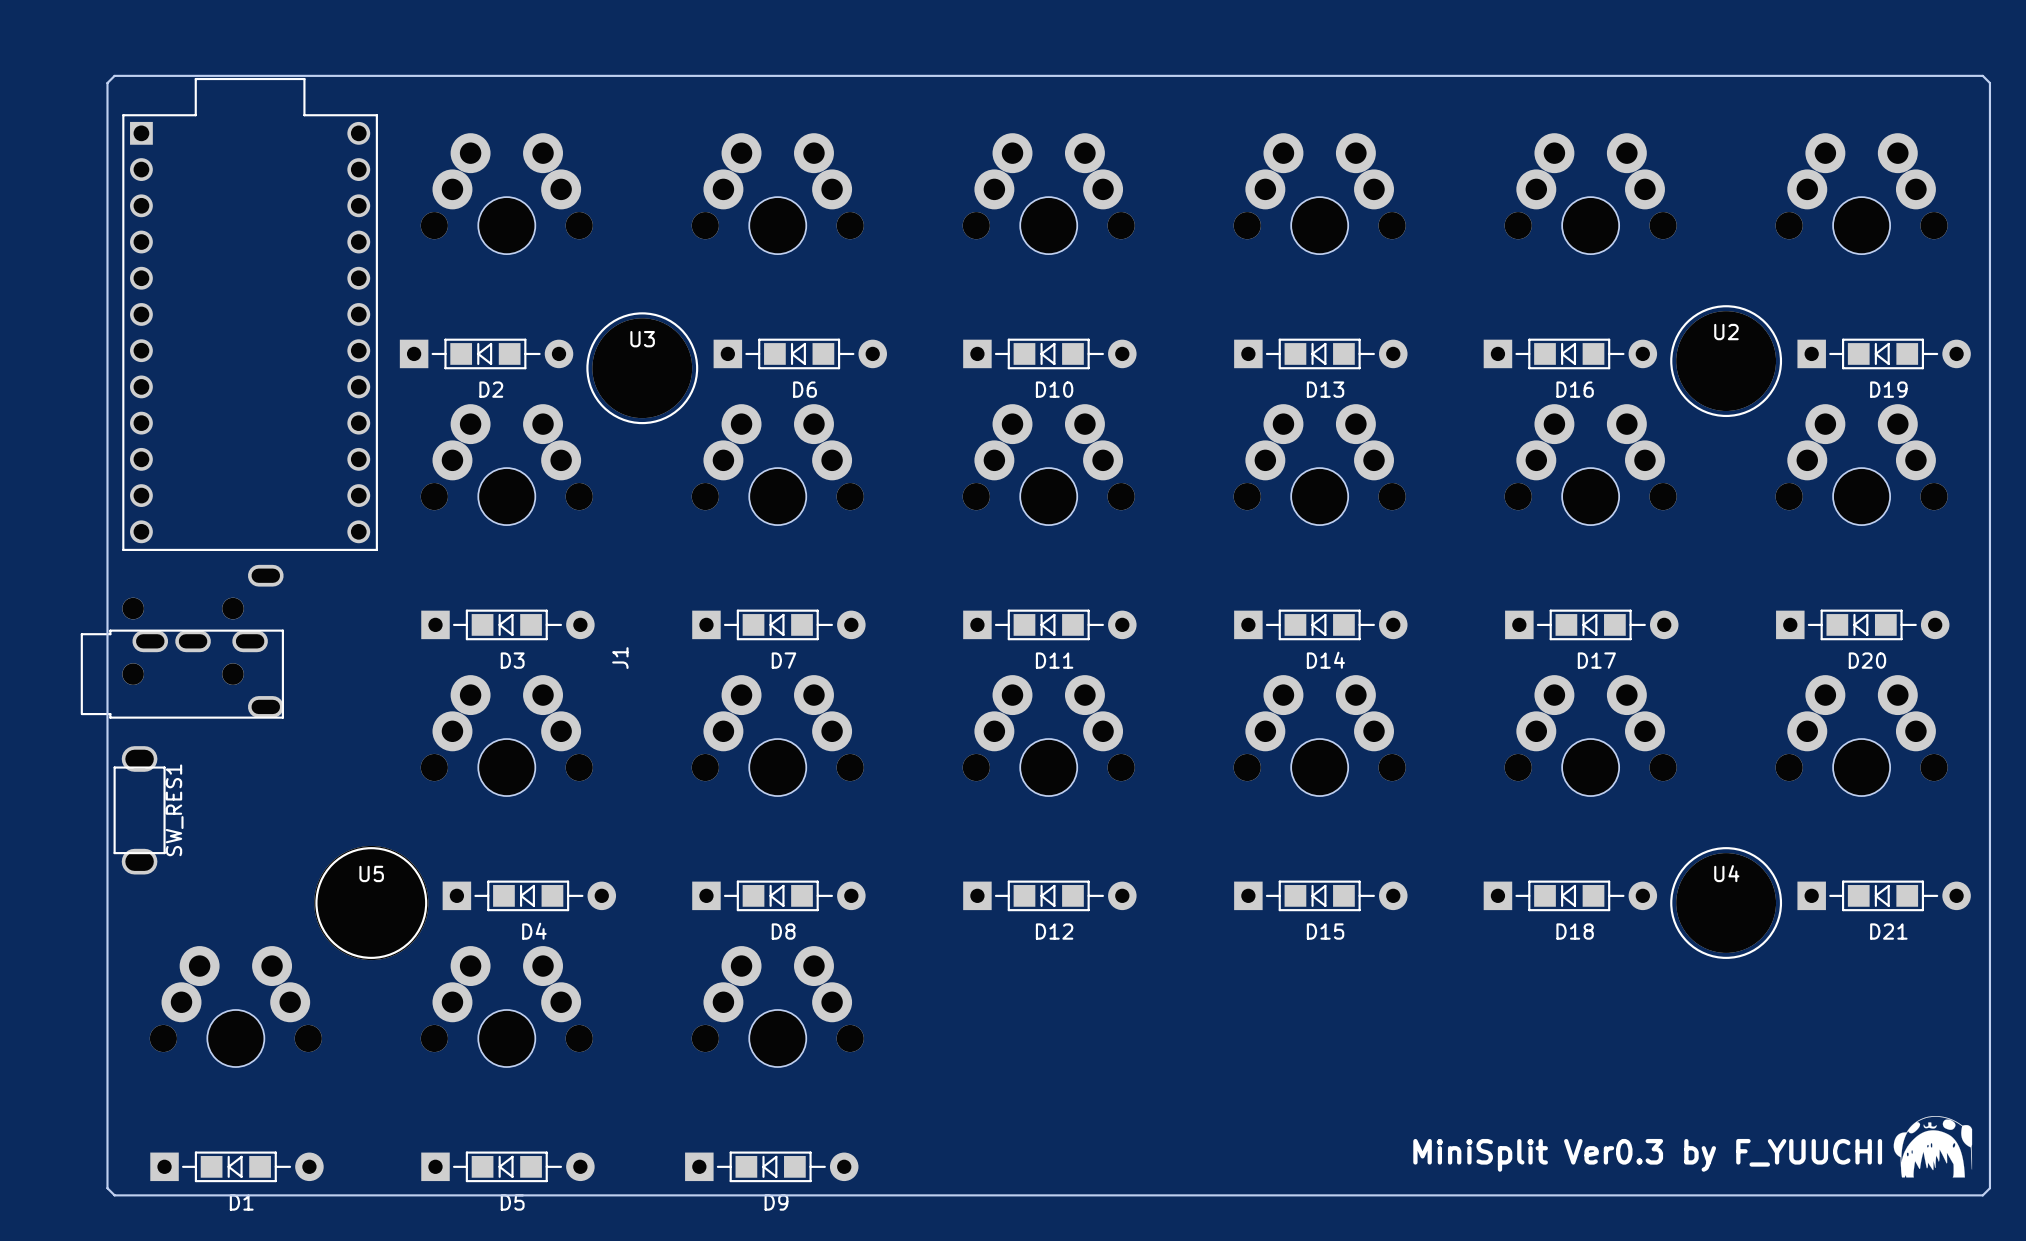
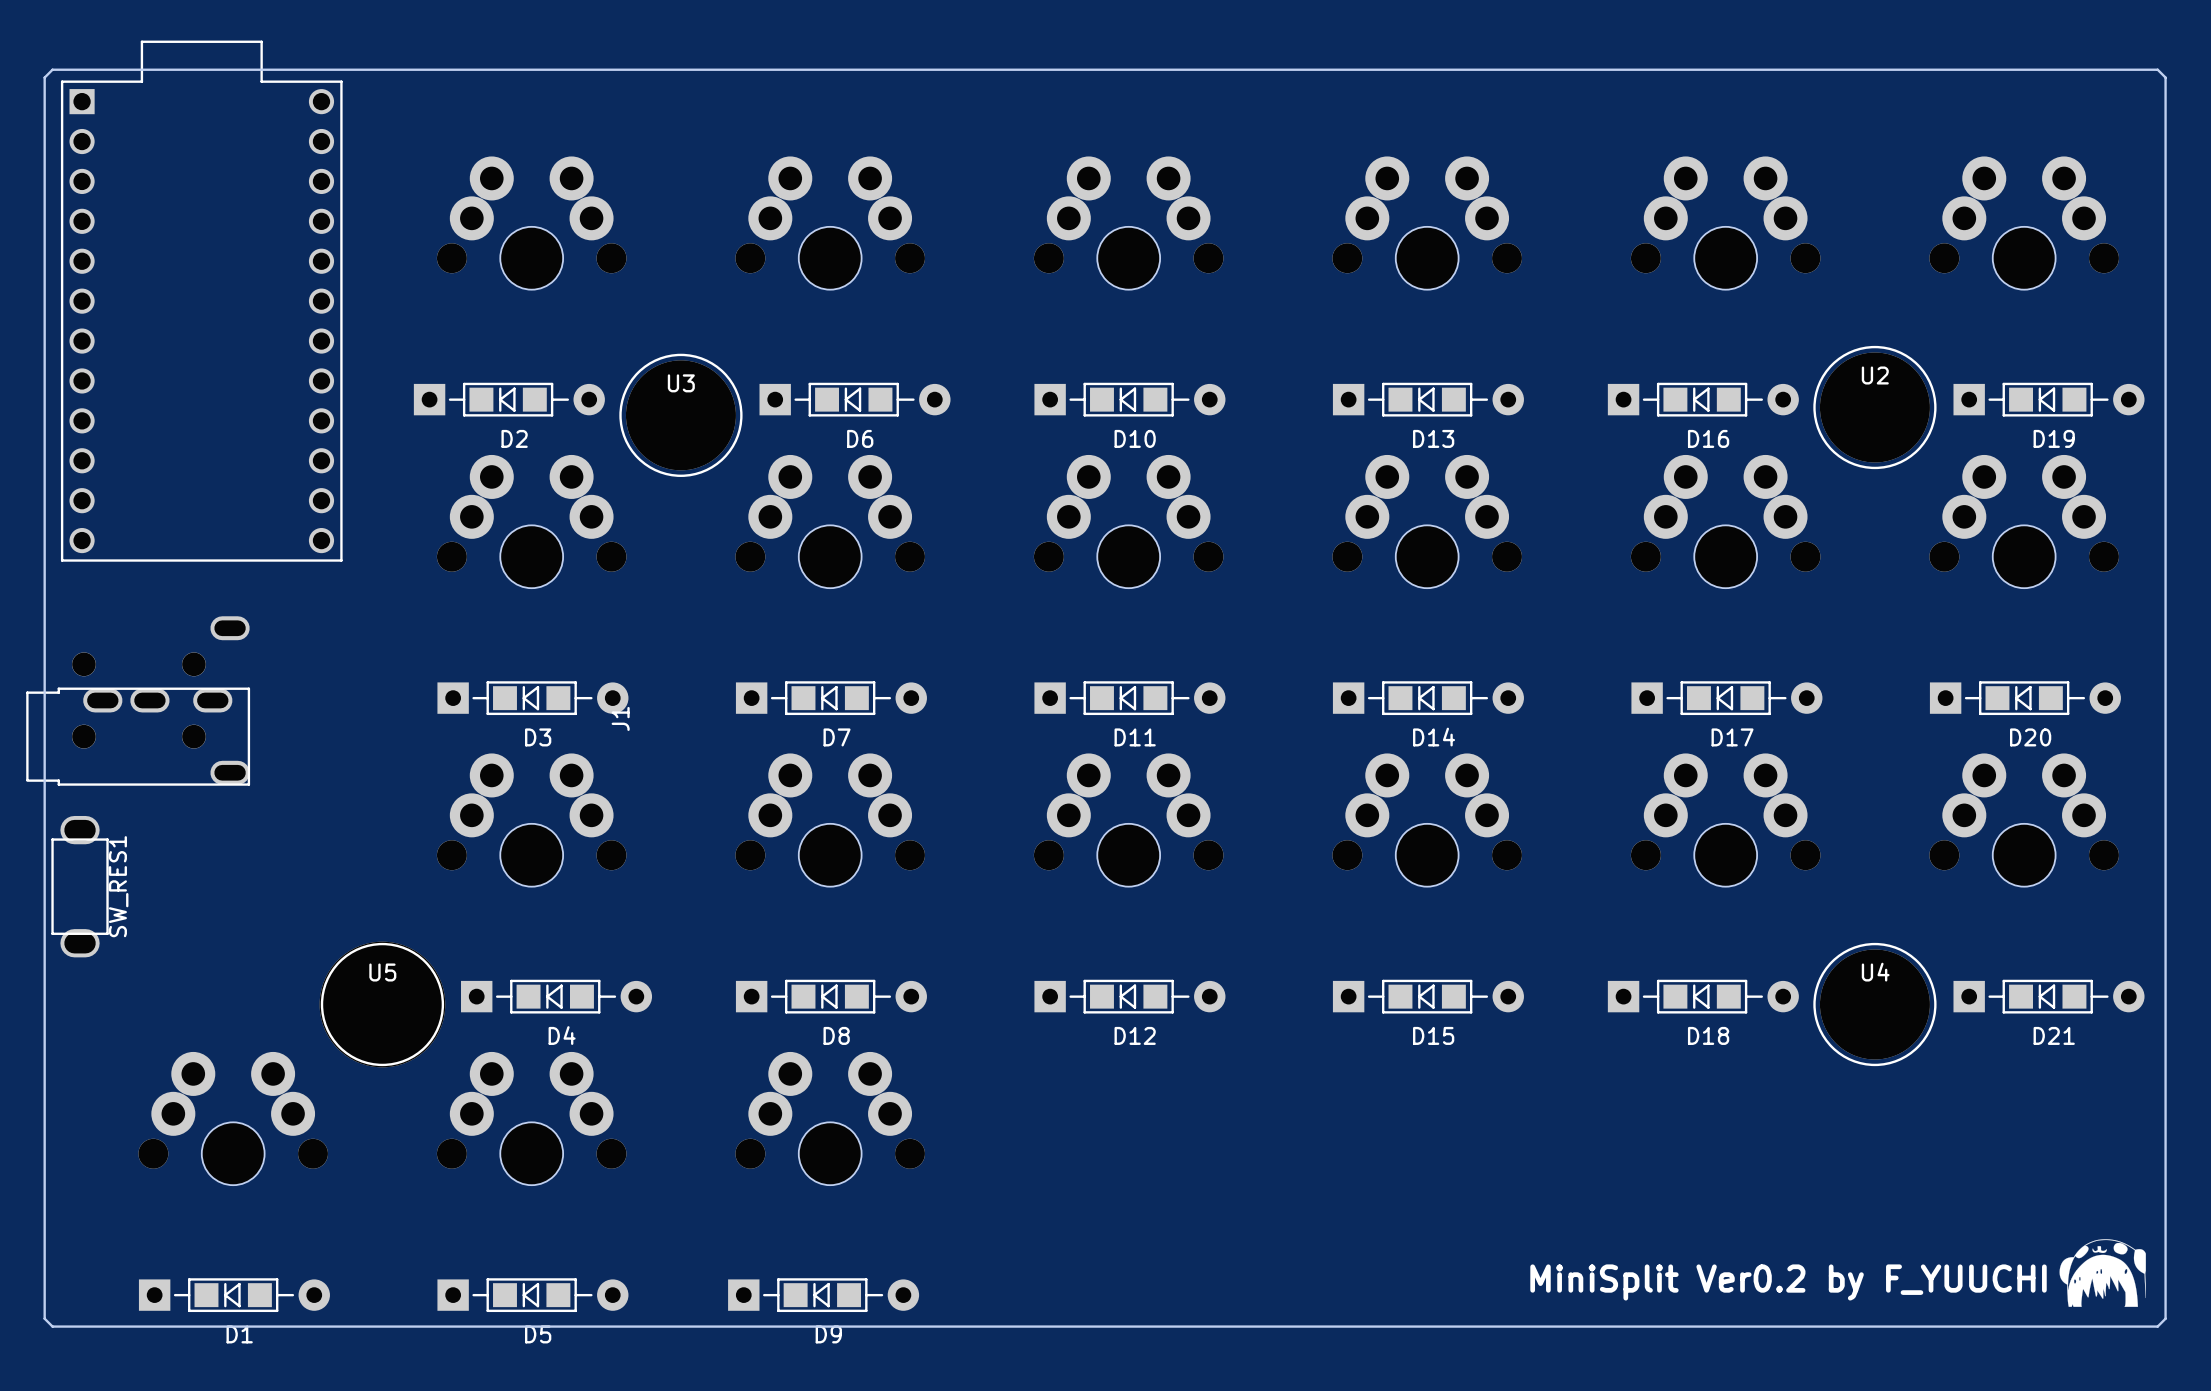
board edge: (1989, 83) (1982, 75) (114, 75) (107, 83) (107, 1188) (114, 1195) -> (2165, 101) (2165, 77) (2157, 69) (52, 69) (44, 77) (44, 1318) (52, 1326) (99, 1326)
part position: (250, 314) -> (201, 301)
J1 position: (182, 641) -> (138, 701)
SW_RES1 position: (139, 810) -> (80, 886)
text: MiniSplit Ver0.3 by F_YUUCHI (1647, 1155) -> MiniSplit Ver0.2 by F_YUUCHI (1788, 1282)

